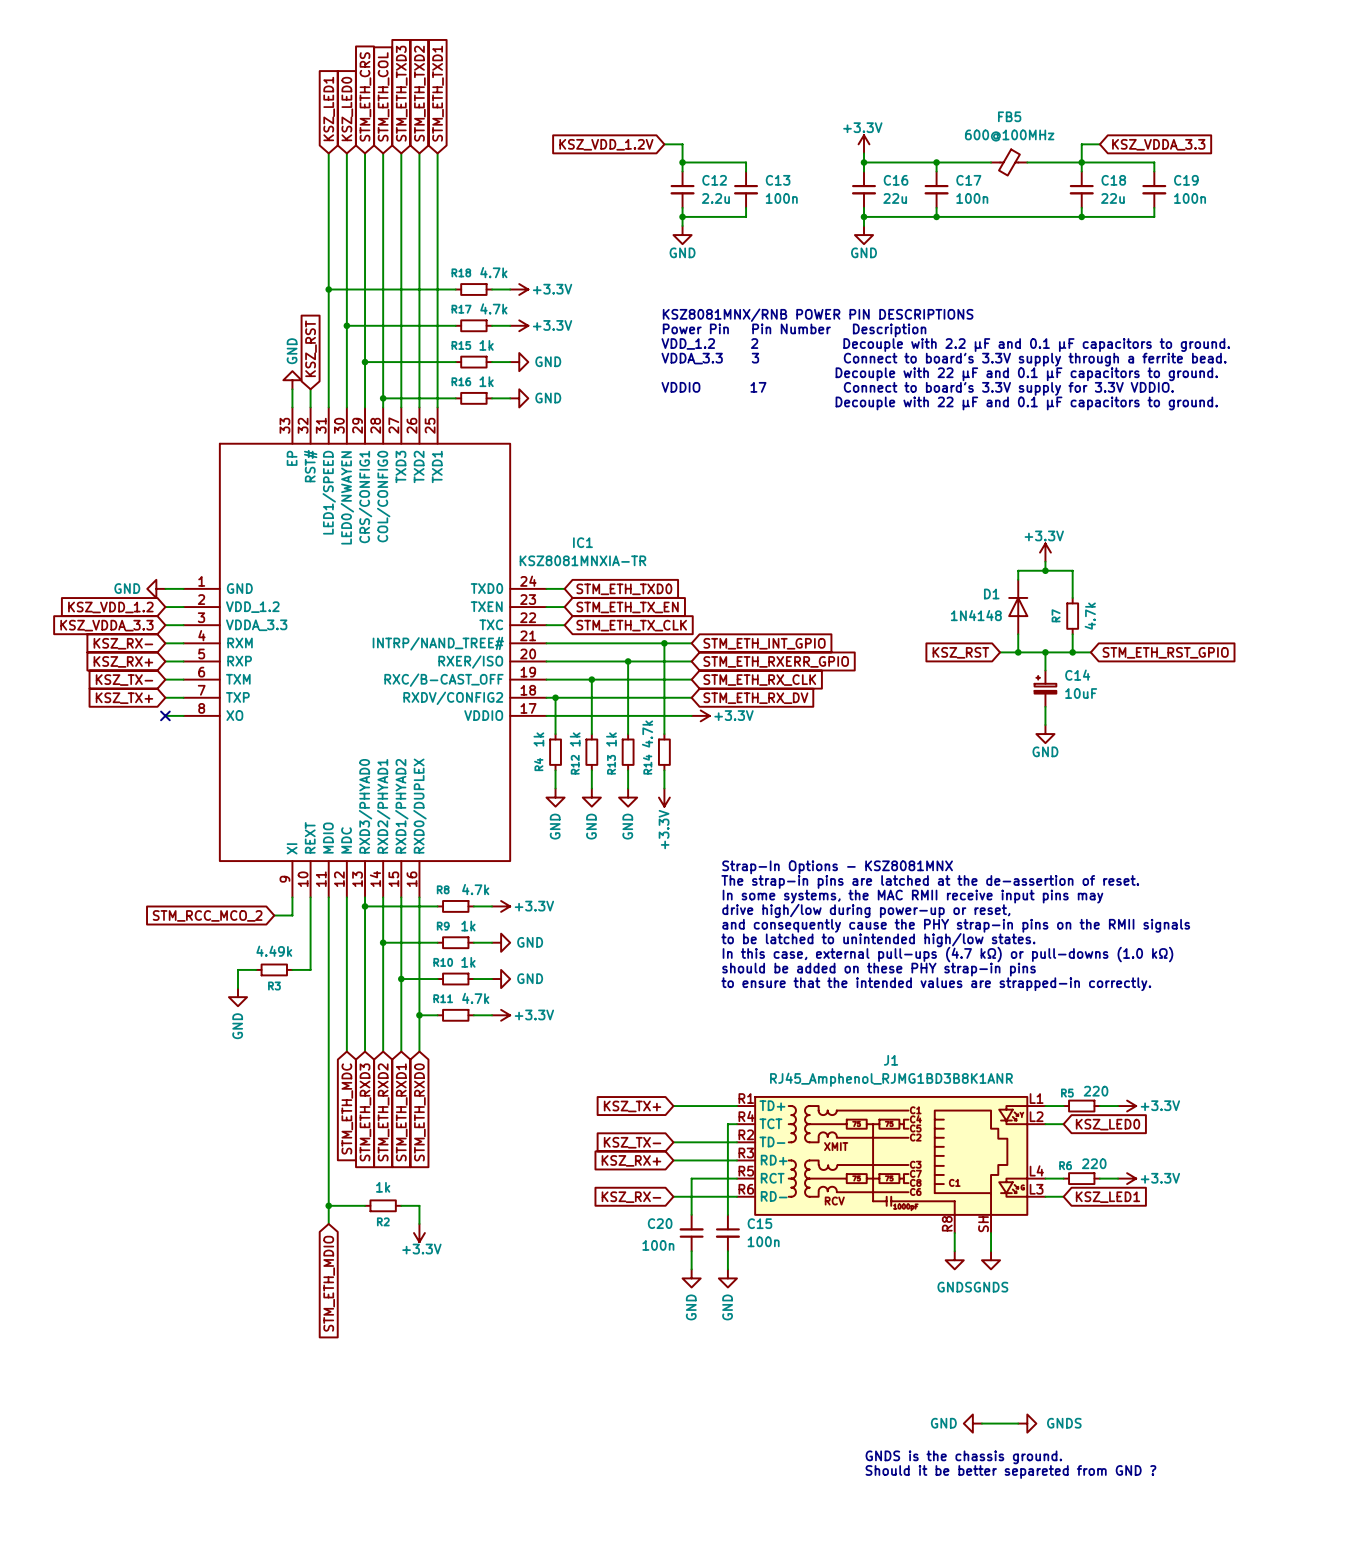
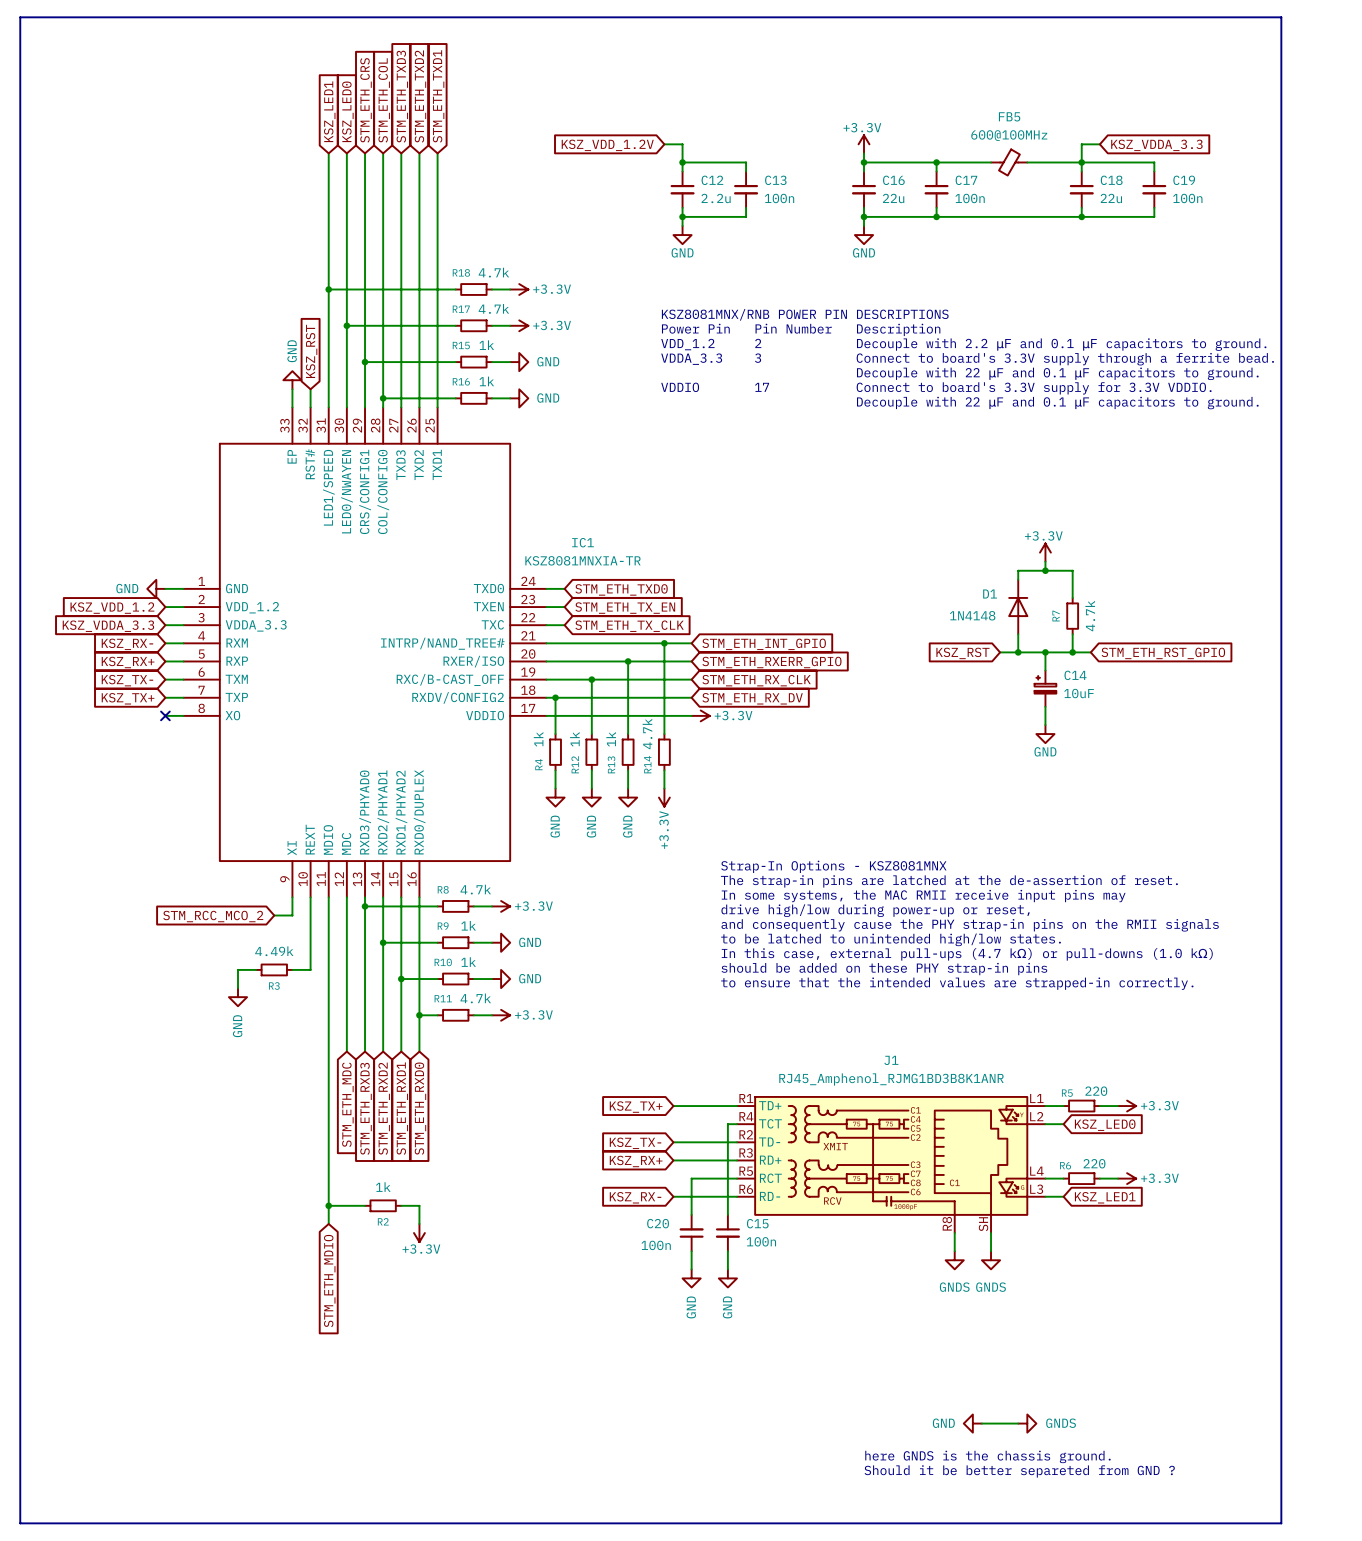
line: none -> (20, 17) (1281, 17) (1281, 1523) (20, 1523) (20, 17)
text: GNDS is the chassis ground. (963, 1457) -> here GNDS is the chassis ground. (987, 1456)

